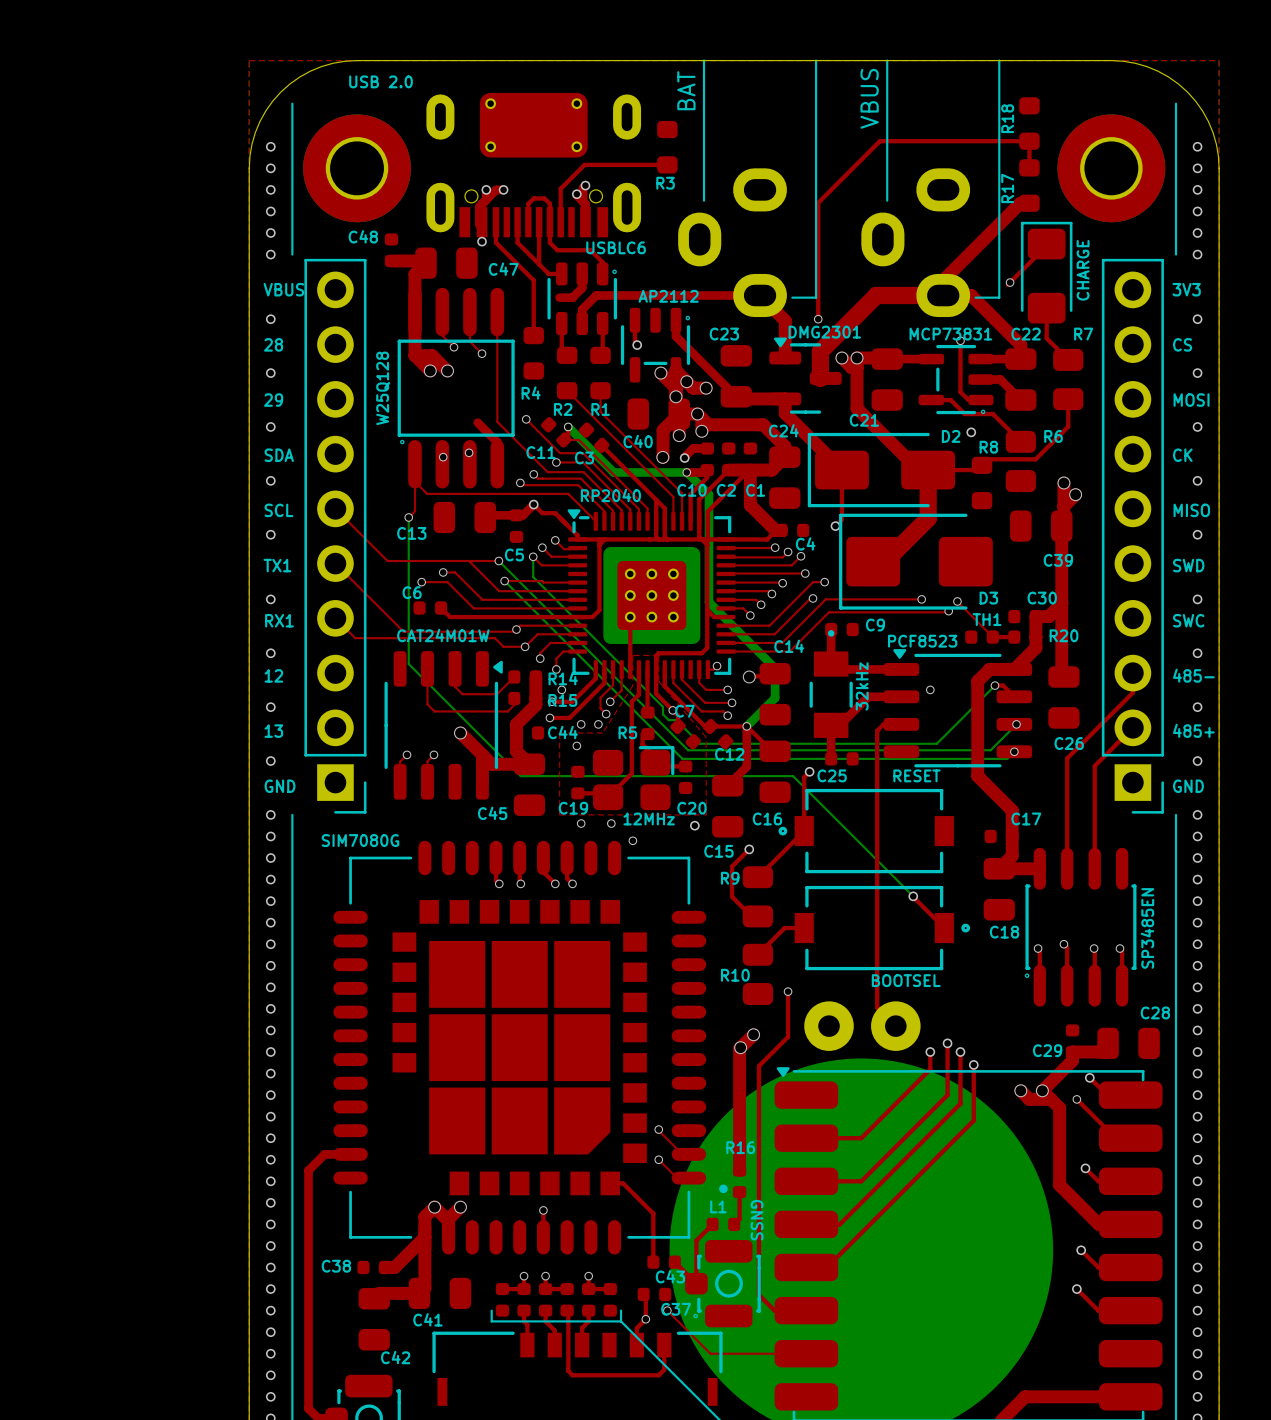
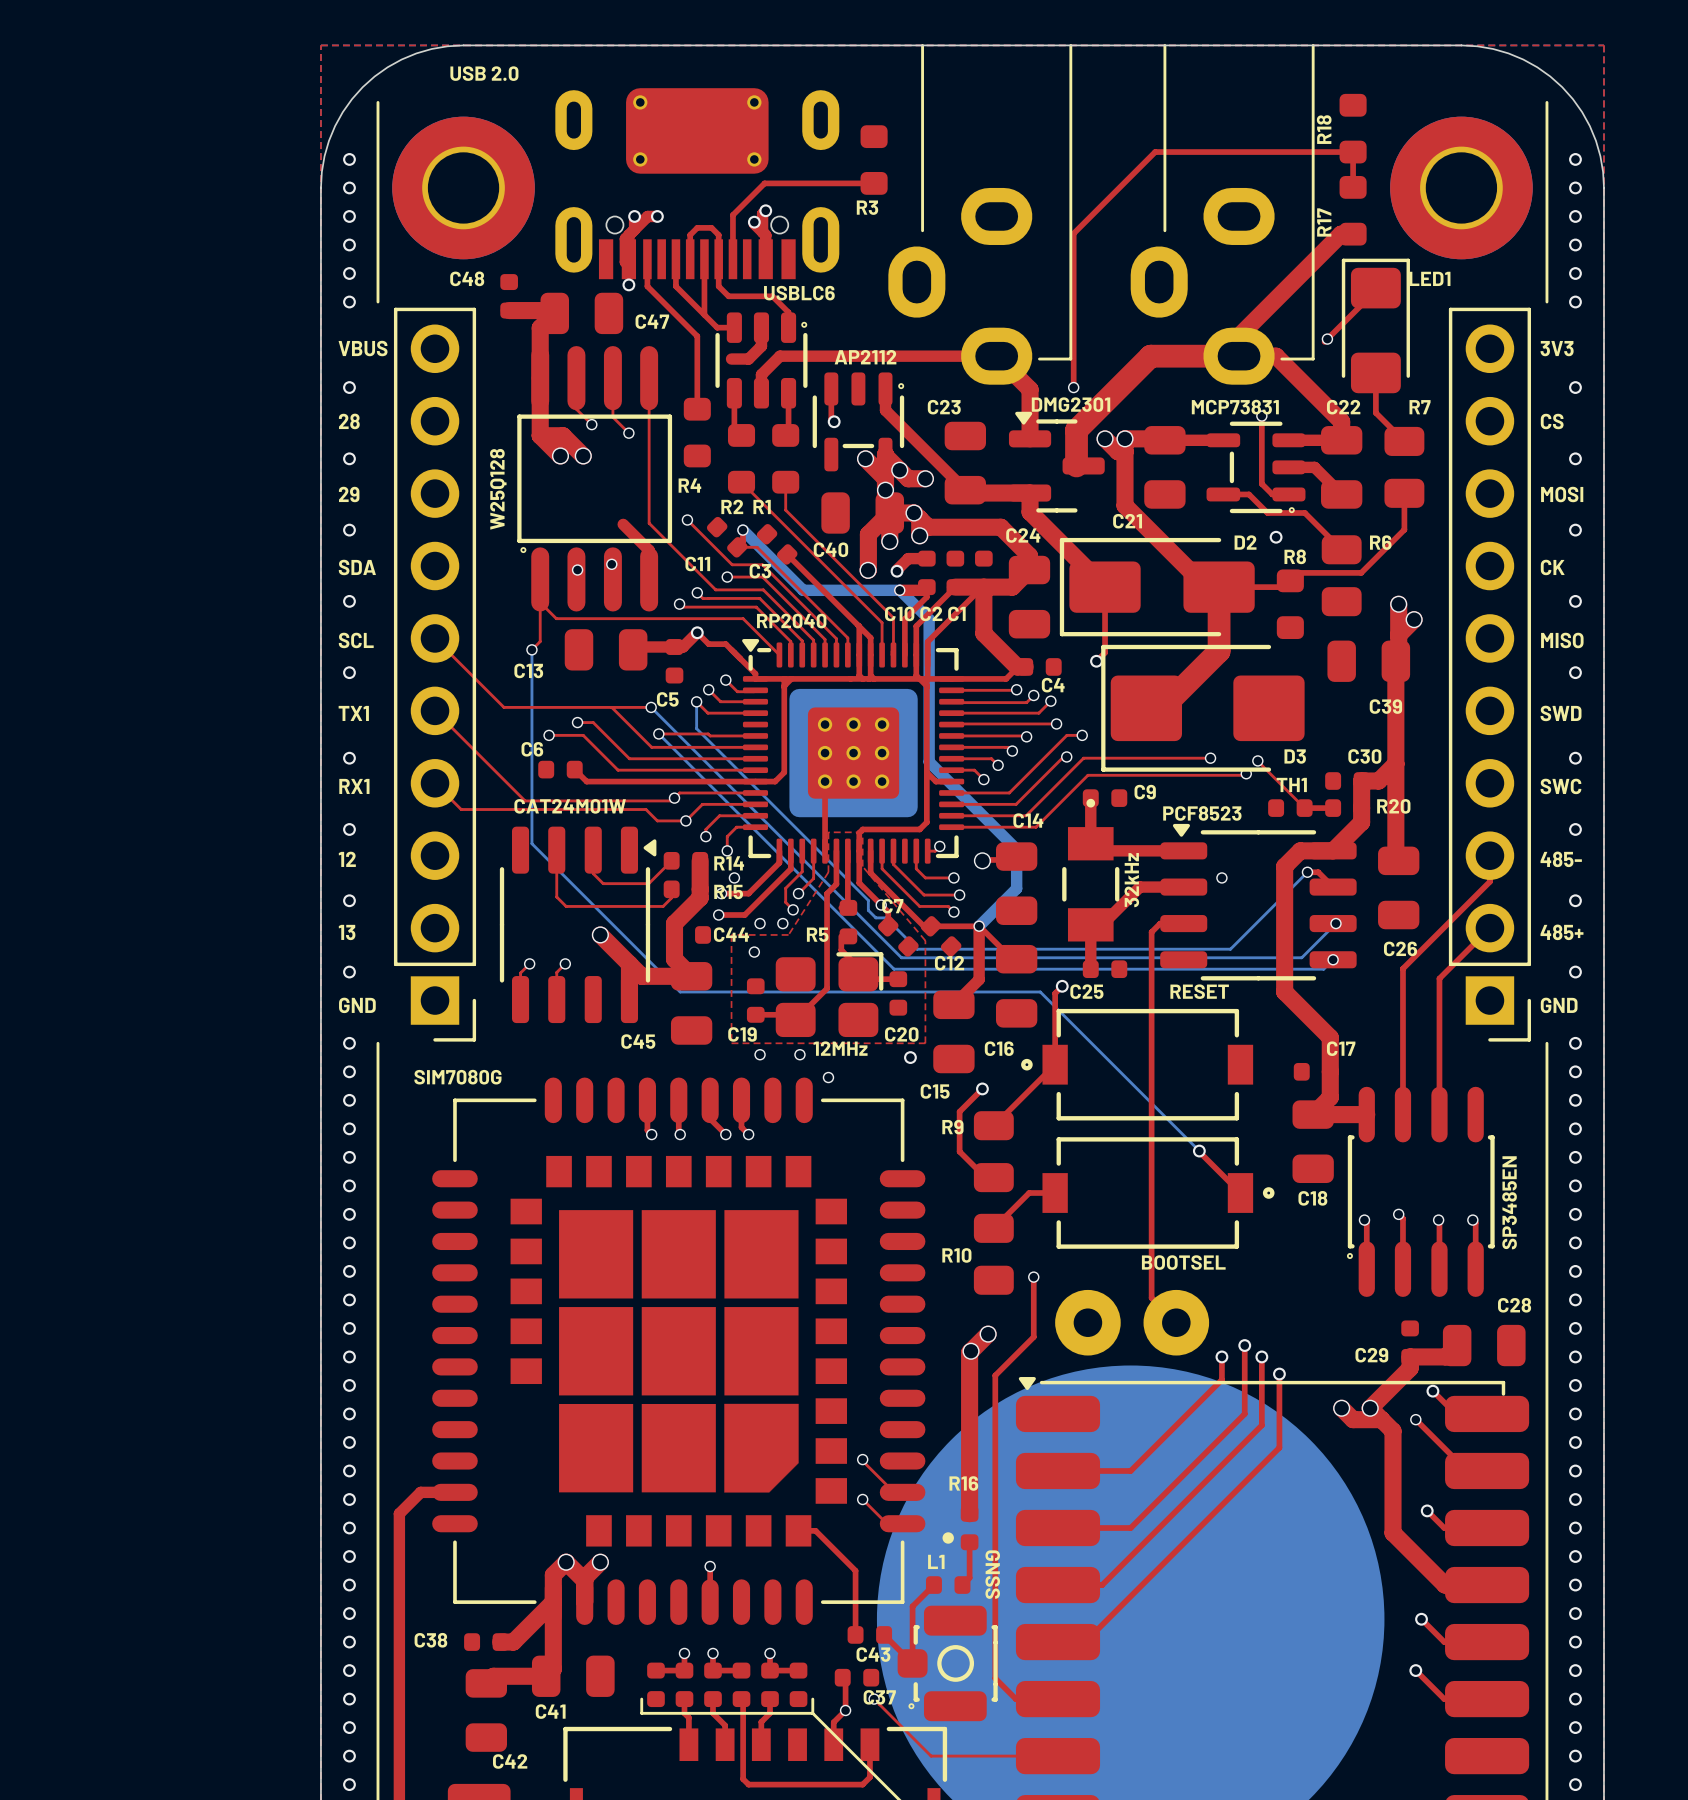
text: BAT (686, 90) -> none
text: VBUS (869, 98) -> none
text: none -> LED1 (1429, 278)
text: CHARGE (1083, 270) -> none

